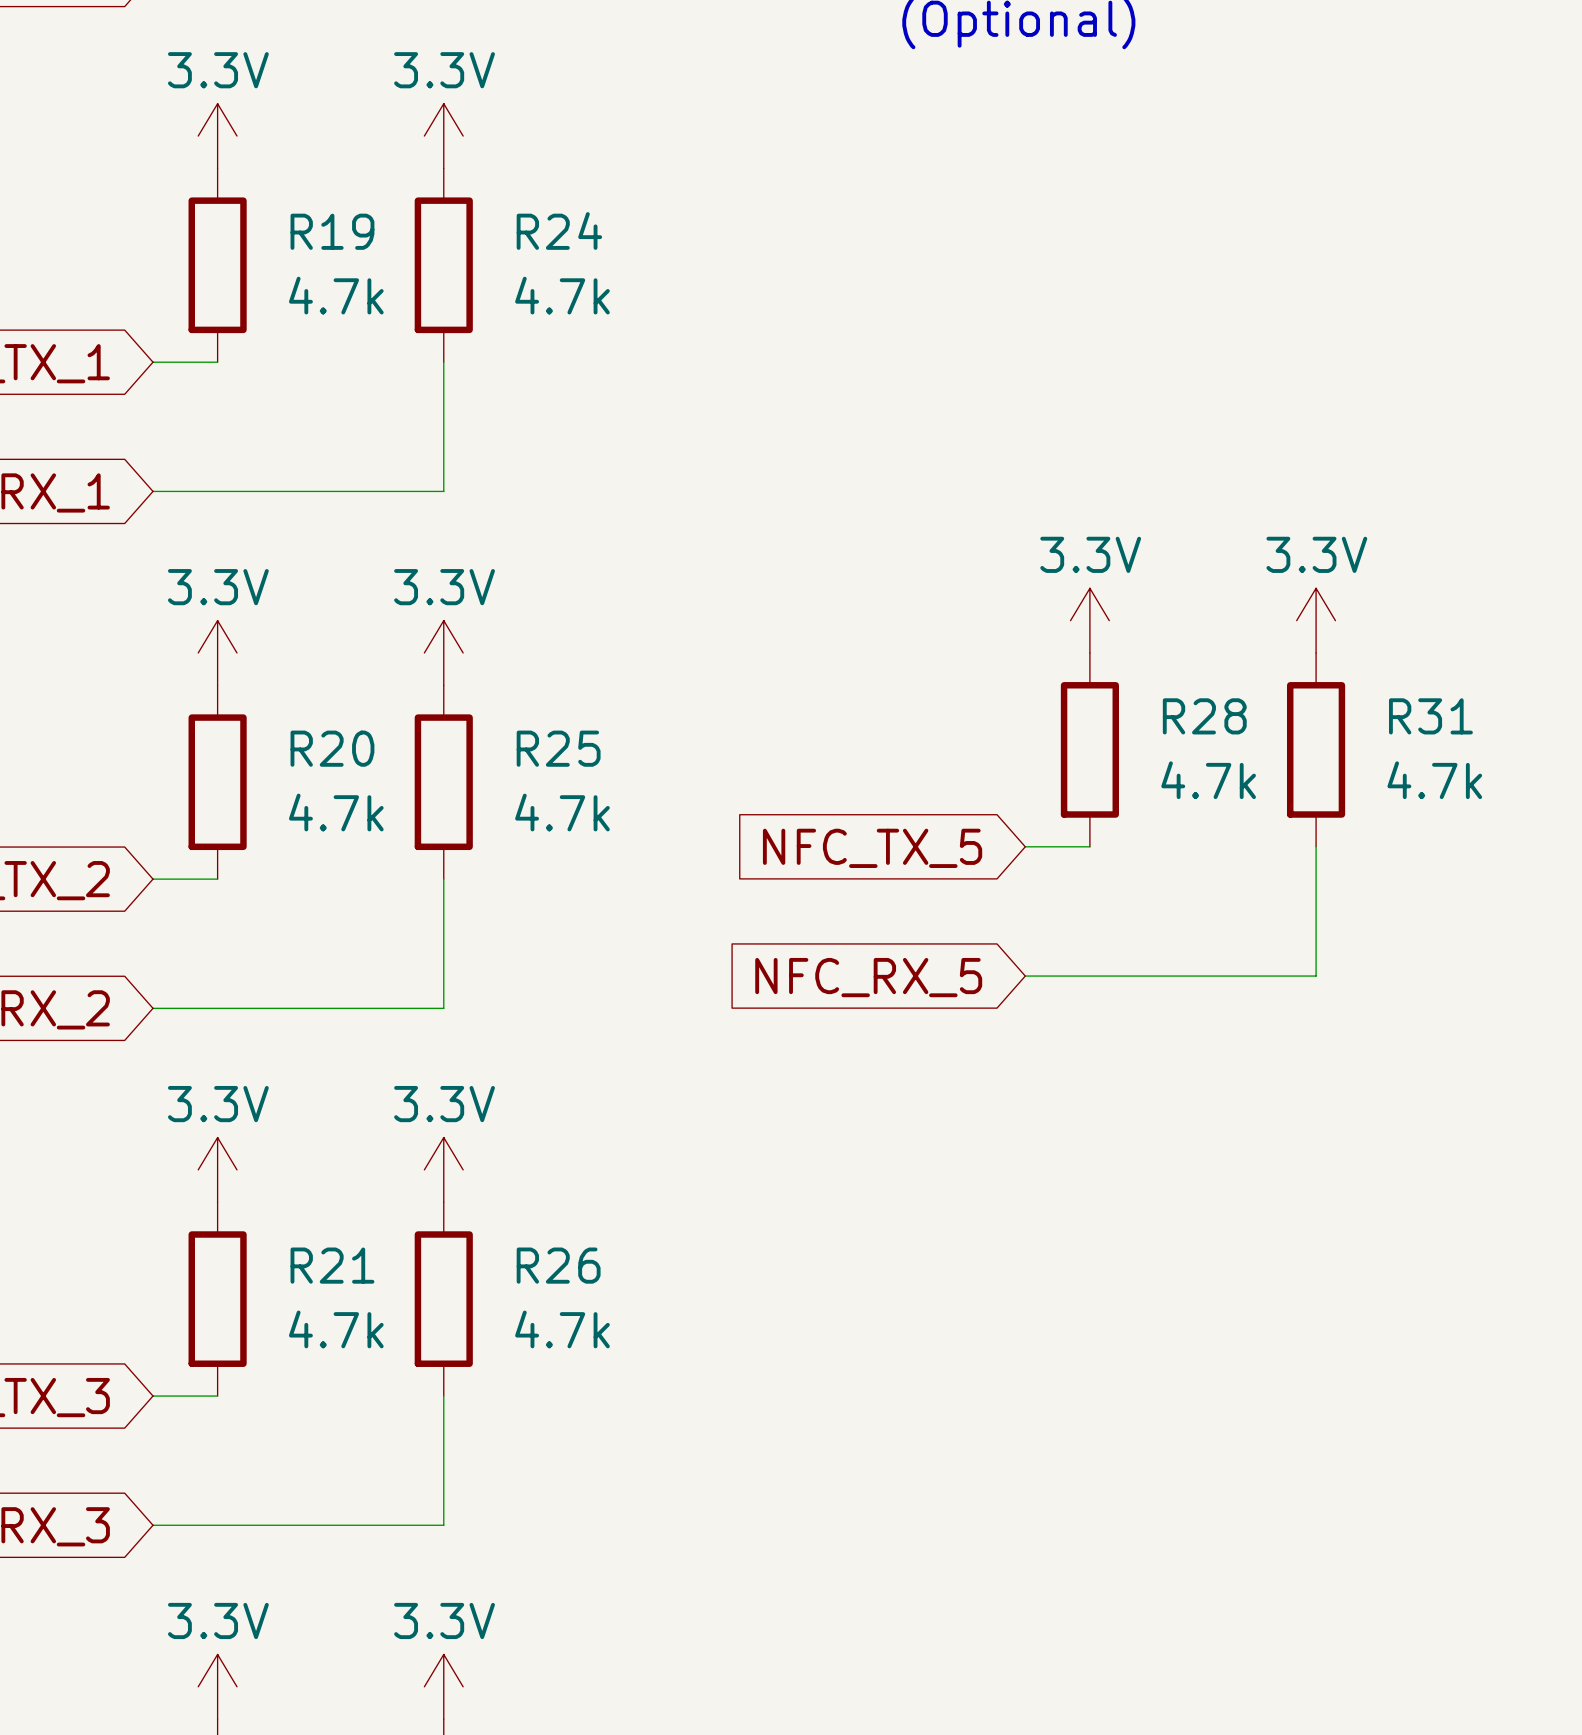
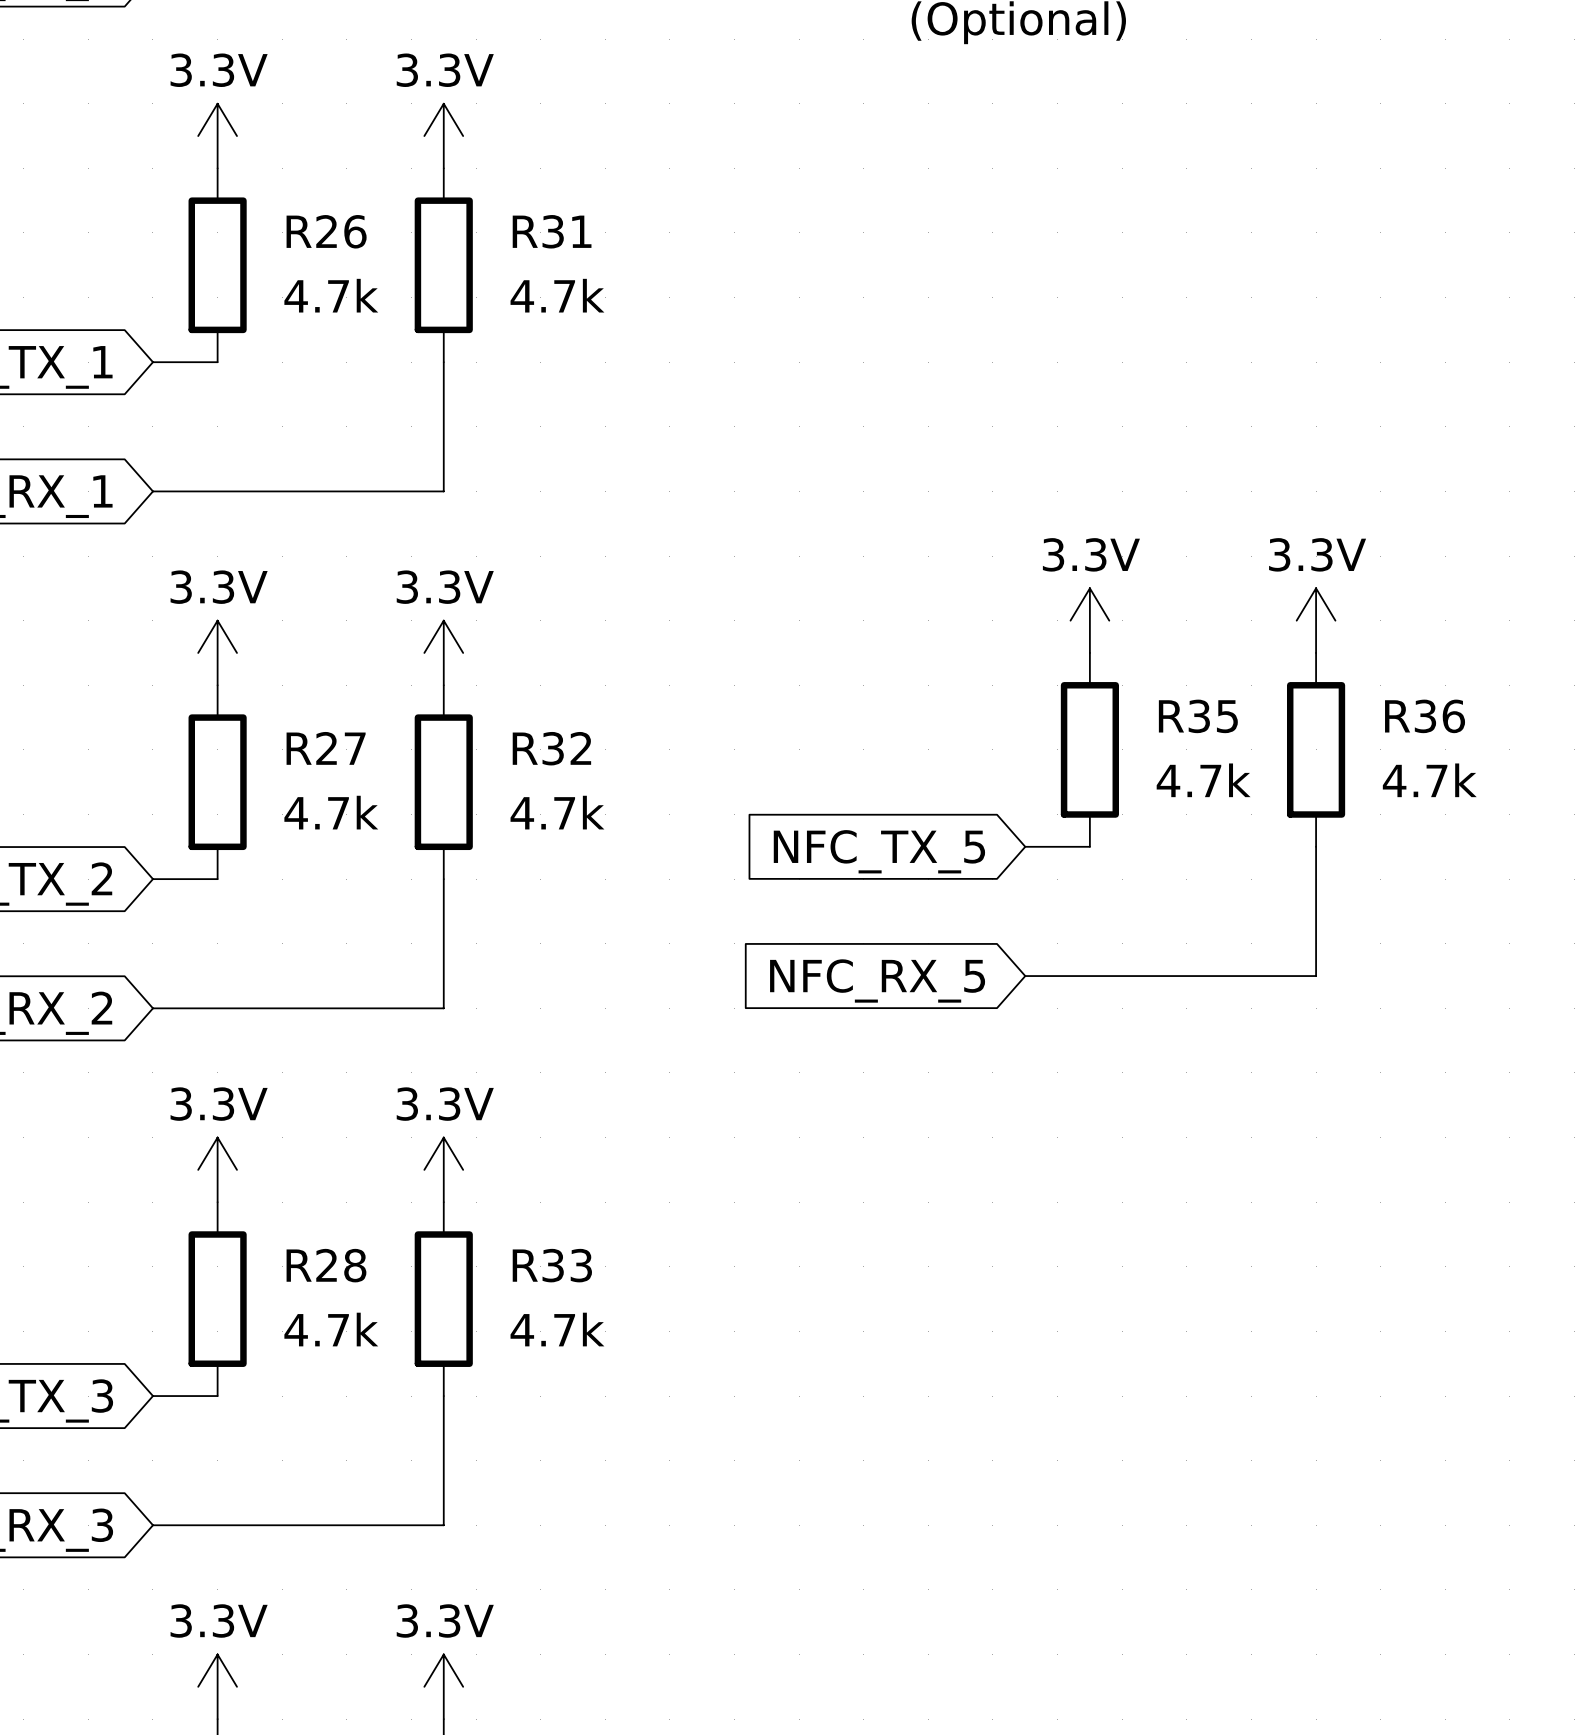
R24 name: R24 (559, 230) -> R31 (552, 231)
R19 name: R19 (332, 231) -> R26 (326, 231)
R28 name: R28 (1204, 716) -> R35 (1198, 716)
R31 name: R31 (1430, 716) -> R36 (1425, 716)
R20 name: R20 (332, 748) -> R27 (326, 748)
R25 name: R25 (558, 748) -> R32 (551, 748)
R21 name: R21 (332, 1265) -> R28 (326, 1265)
R26 name: R26 (558, 1265) -> R33 (552, 1265)

